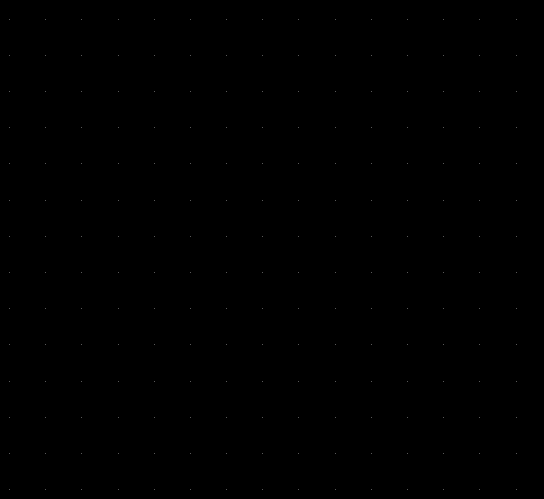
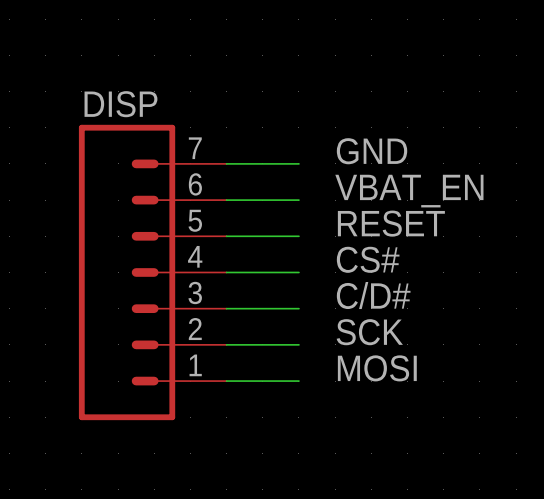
label: none -> GND (372, 151)
wire: none -> (226, 163) (298, 163)
label: none -> VBAT_EN (409, 191)
wire: none -> (226, 200) (298, 200)
label: none -> RESET (391, 223)
wire: none -> (226, 236) (298, 236)
label: none -> CS# (368, 259)
DISP: none -> (152, 272)
wire: none -> (226, 272) (298, 272)
label: none -> C/D# (373, 295)
wire: none -> (226, 308) (298, 308)
label: none -> SCK (369, 332)
wire: none -> (226, 344) (298, 344)
label: none -> MOSI (377, 368)
wire: none -> (226, 381) (298, 381)

